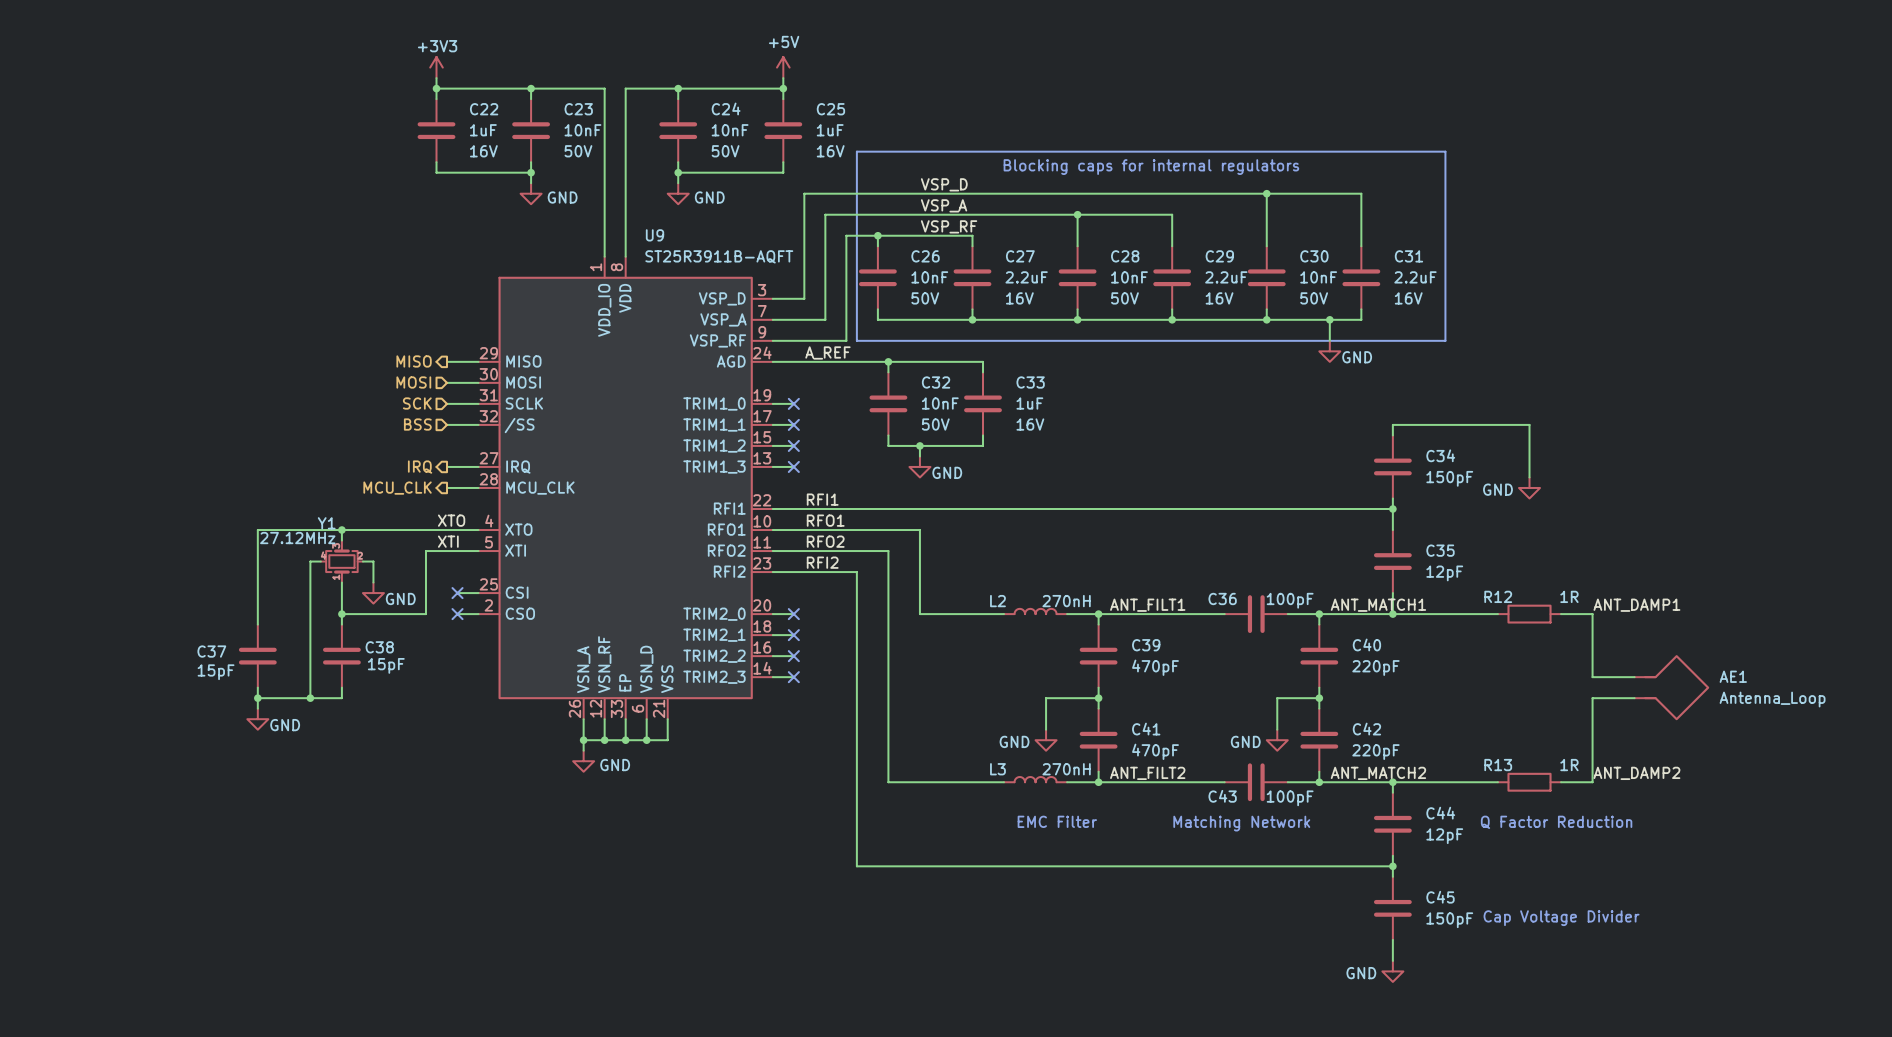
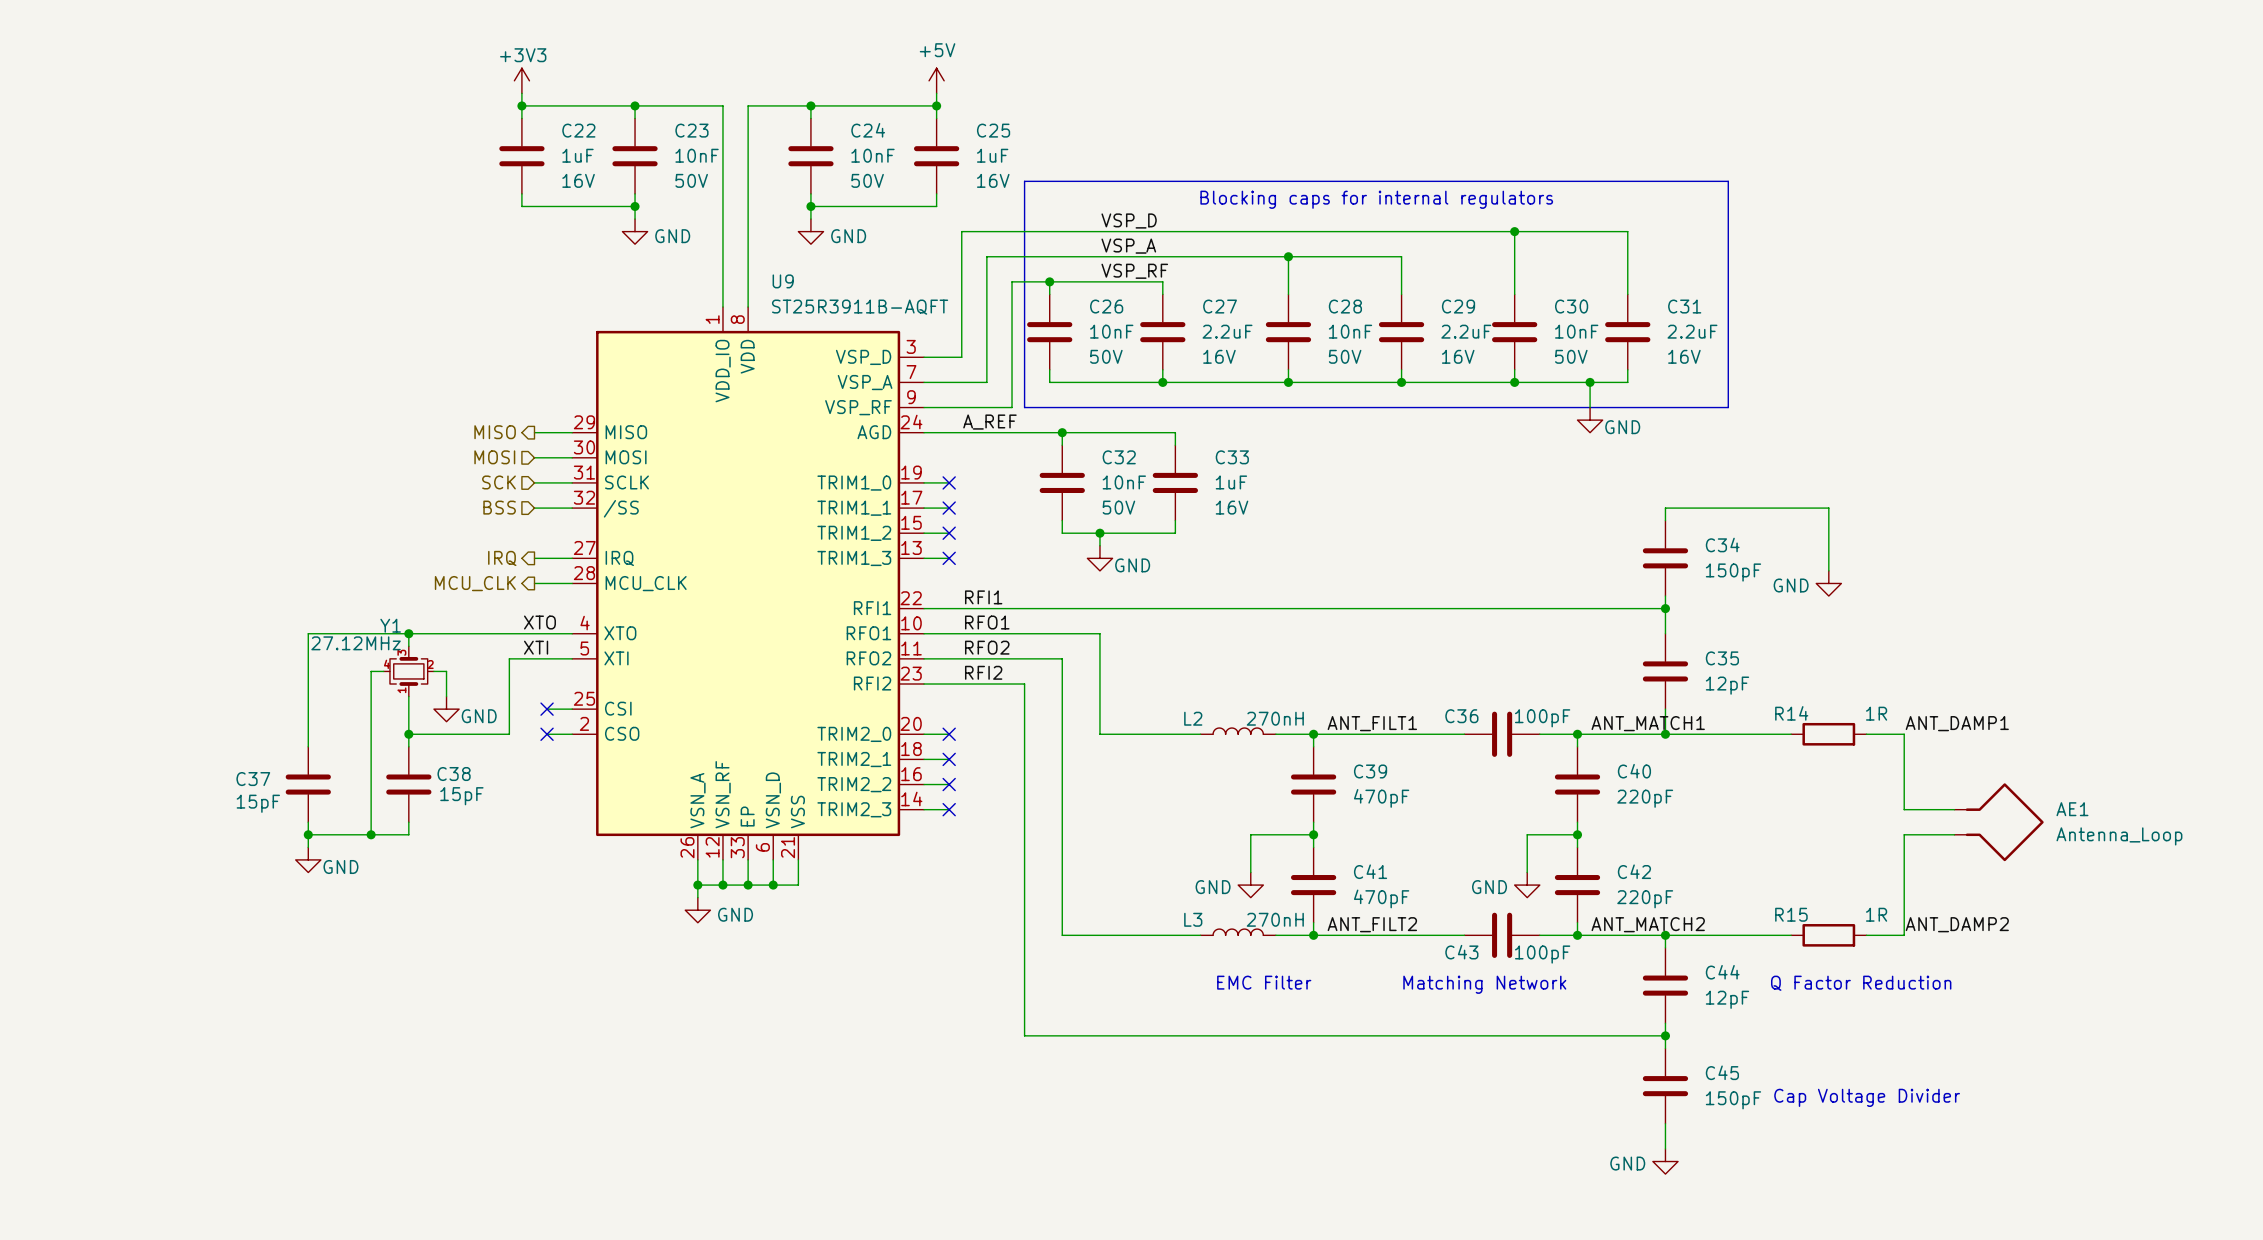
R12 name: R12 (1498, 596) -> R14 (1791, 713)
R13 name: R13 (1498, 765) -> R15 (1791, 914)

